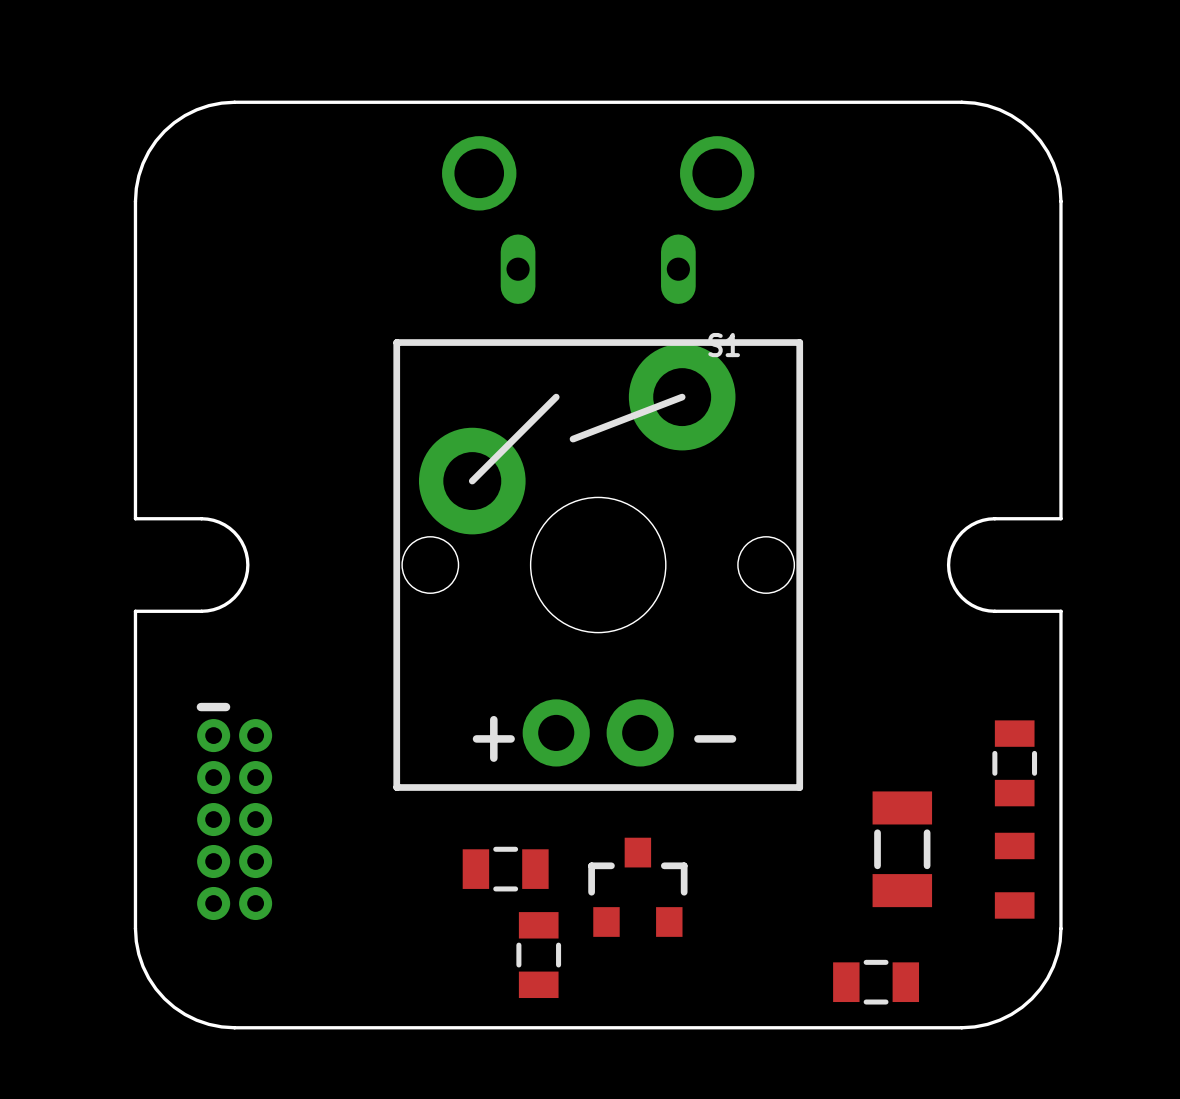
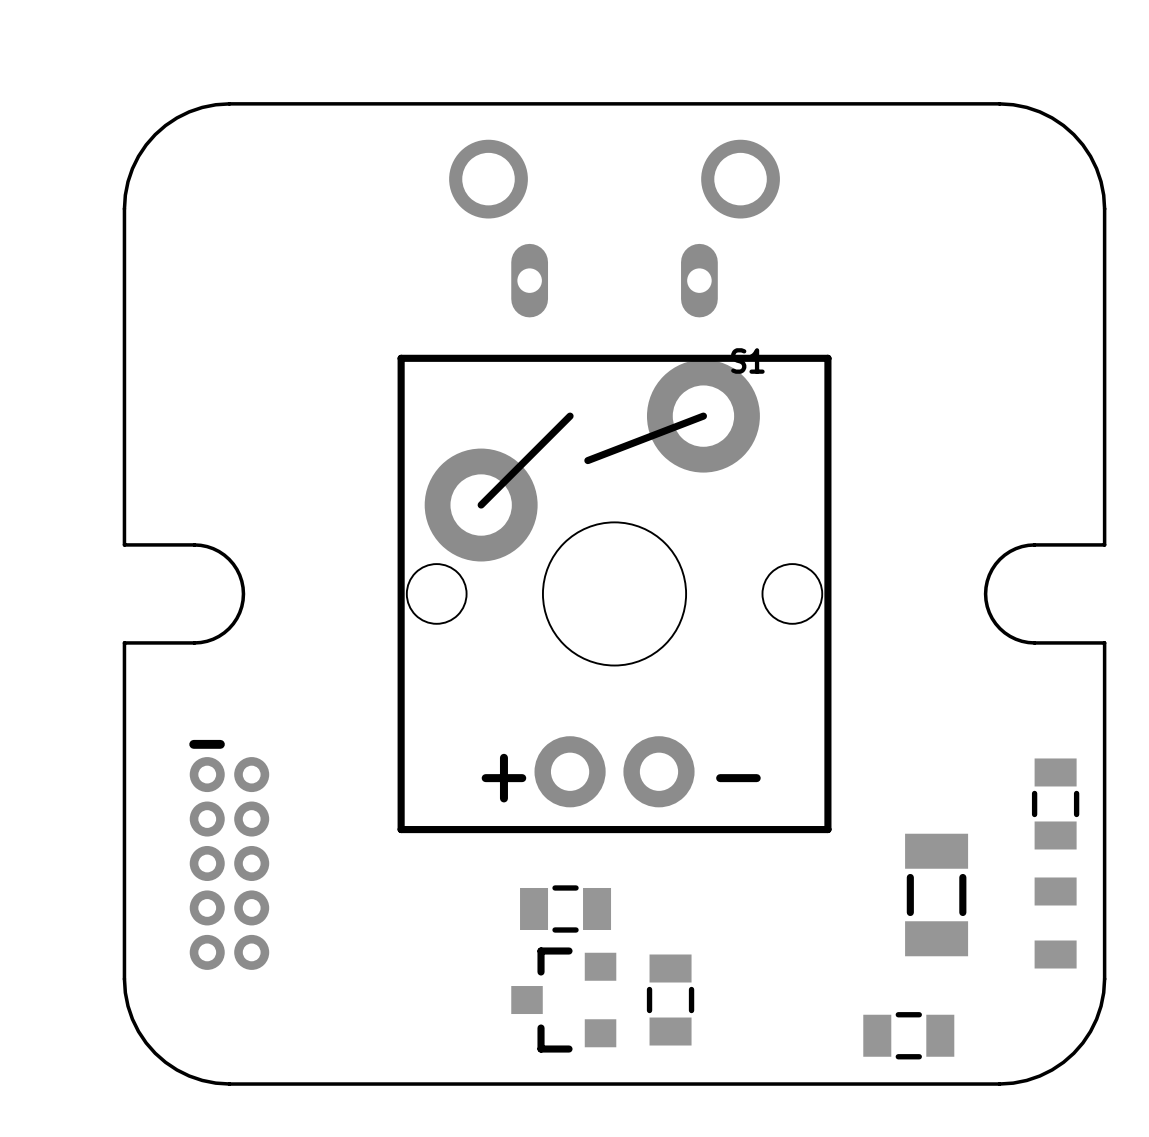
part position: (505, 869) -> (565, 908)
part: (637, 887) -> none
part footprint: [516, 912, 562, 999] -> [511, 947, 617, 1053]
part: none -> (670, 1000)

